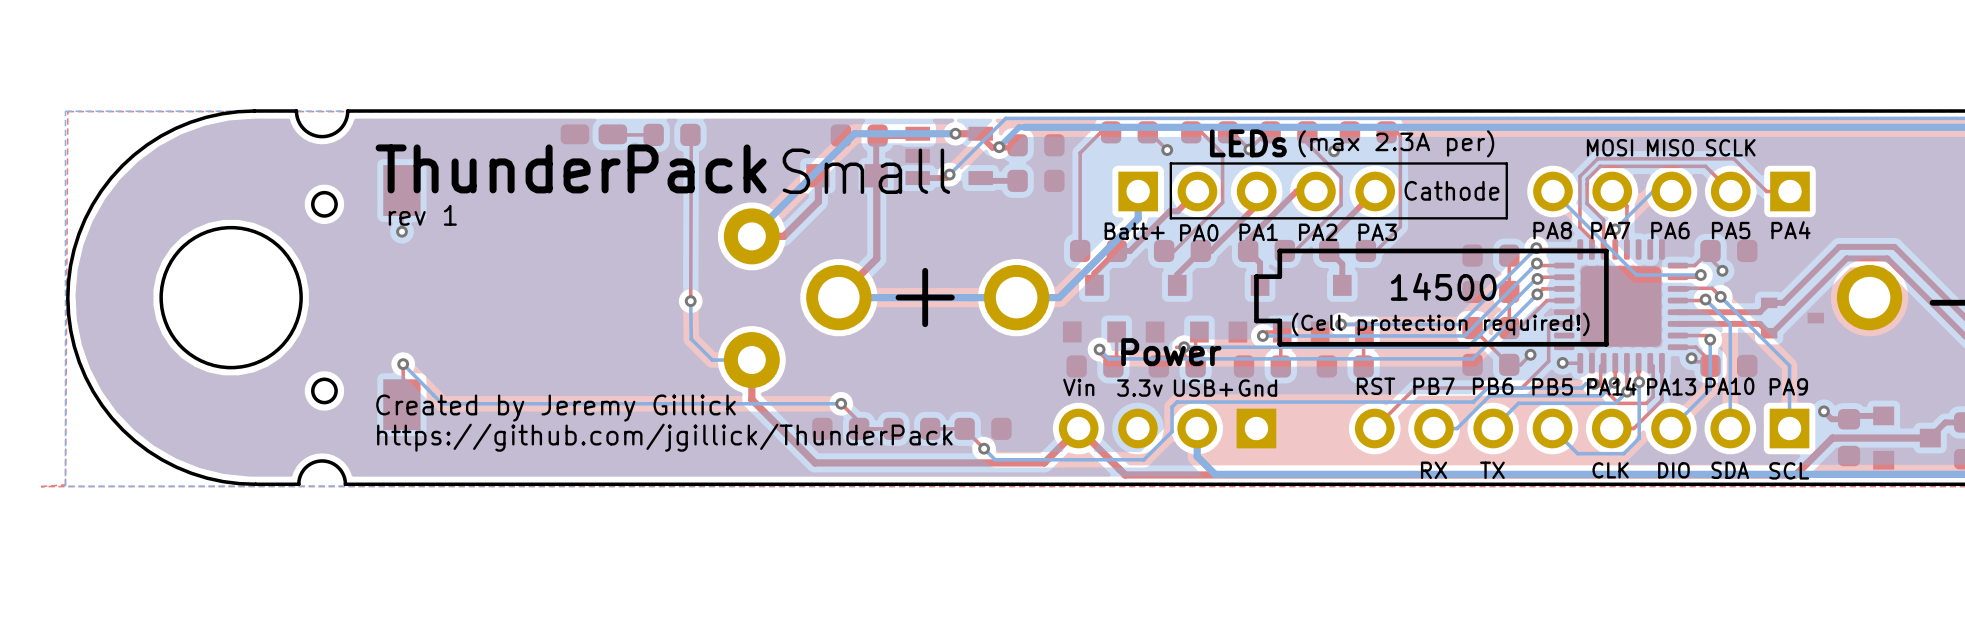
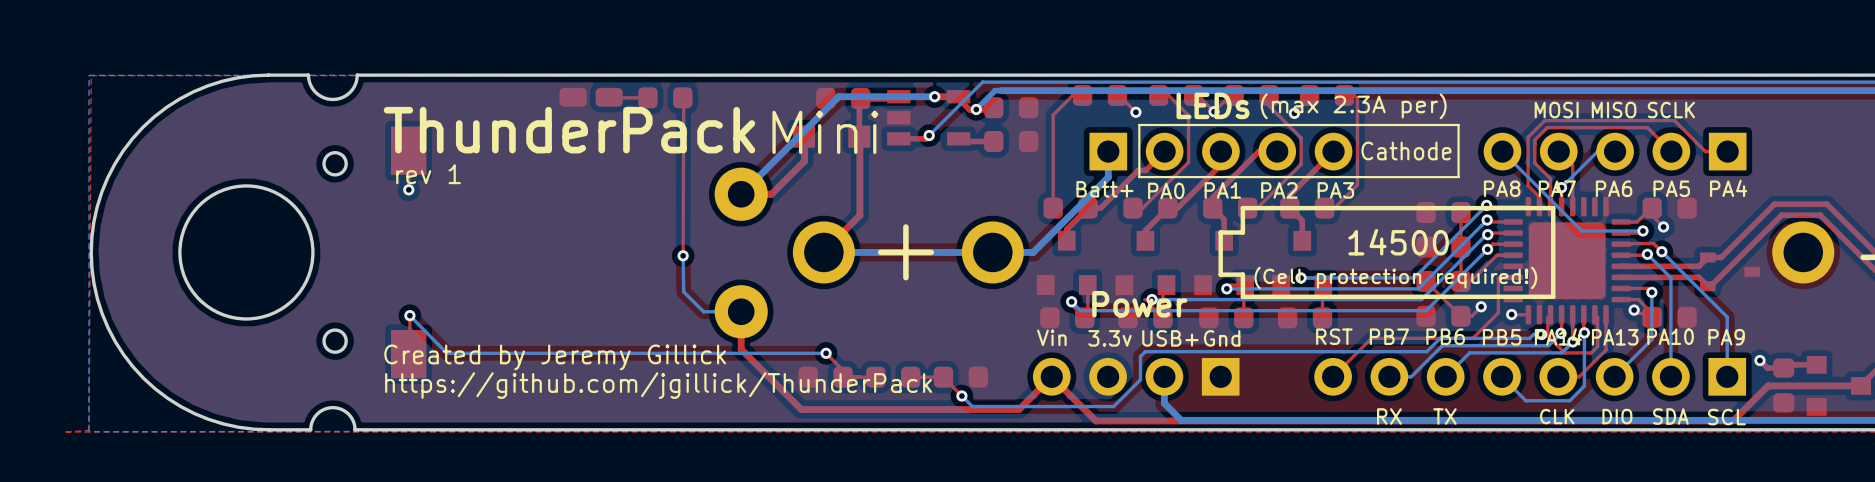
text: Small (866, 171) -> Mini (825, 132)

